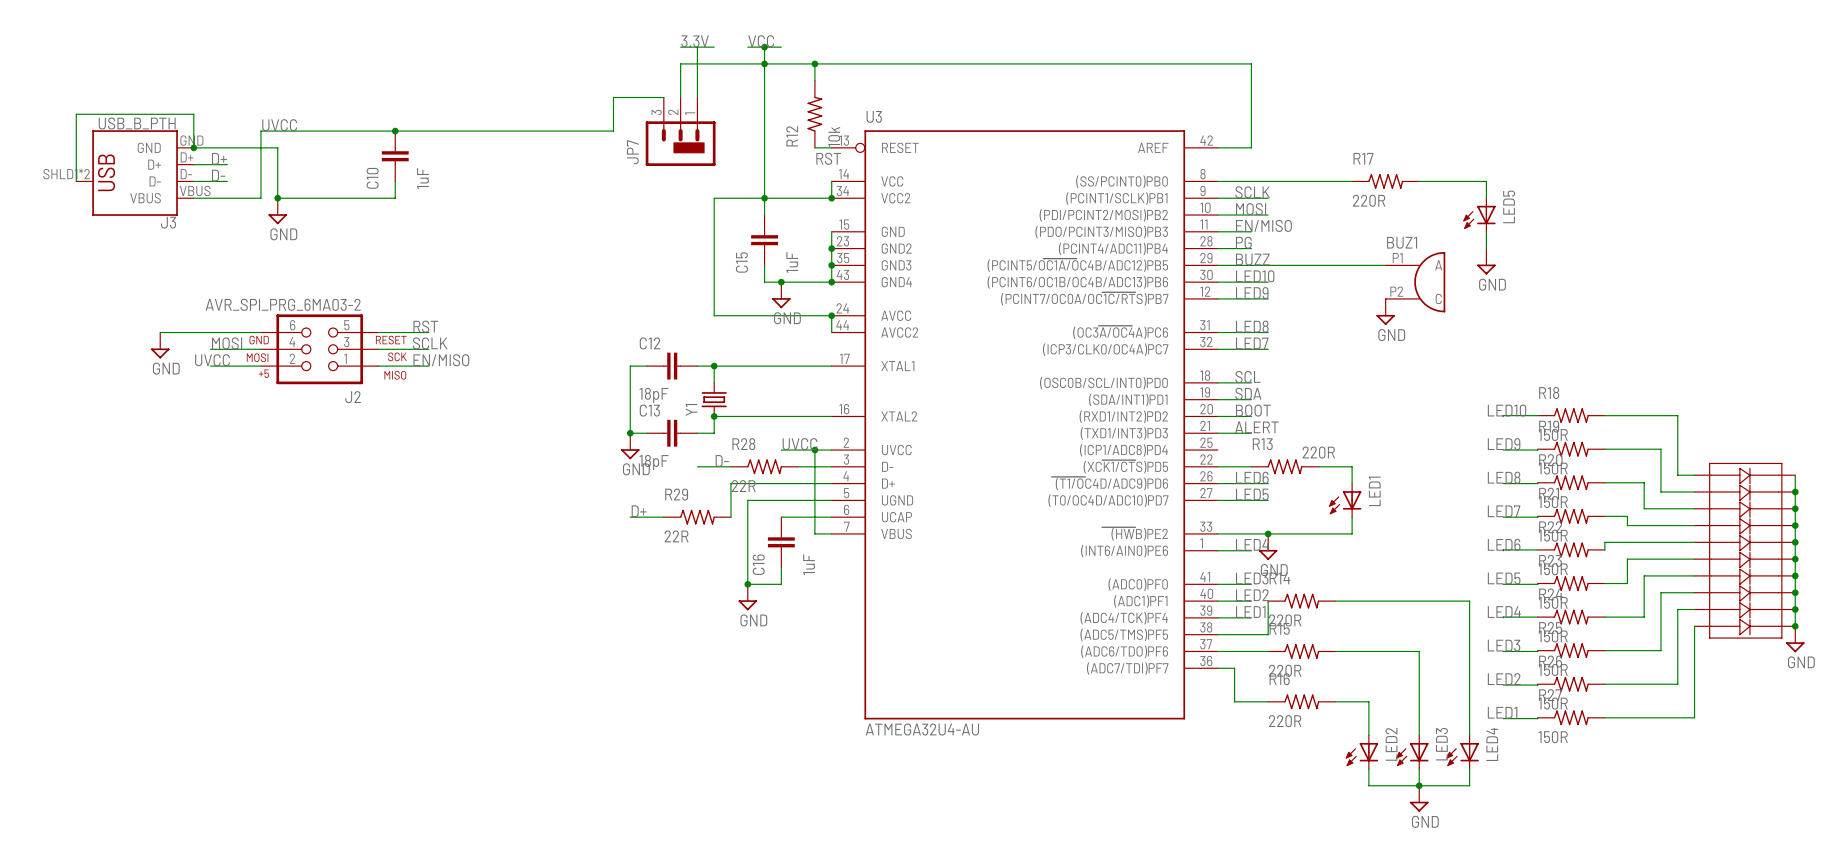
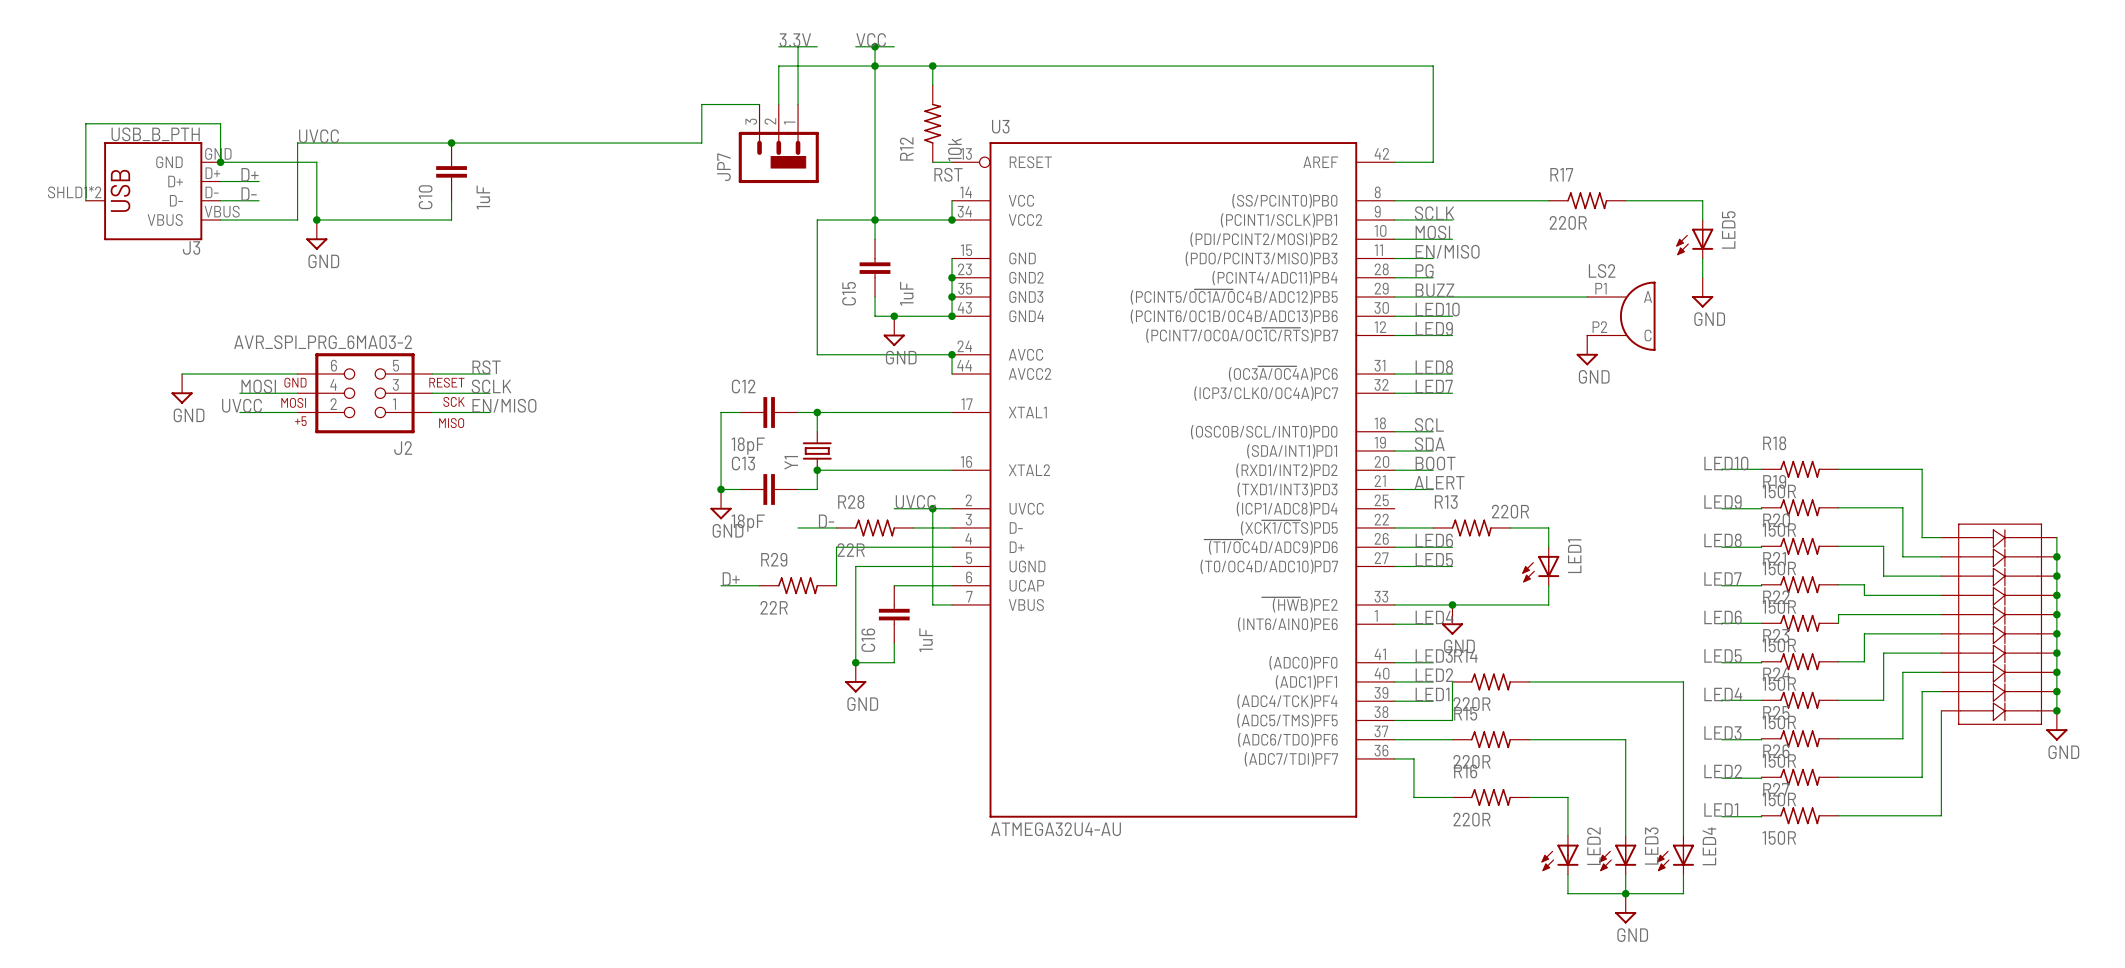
BUZ1 name: BUZ1 (1402, 242) -> LS2 (1602, 271)

